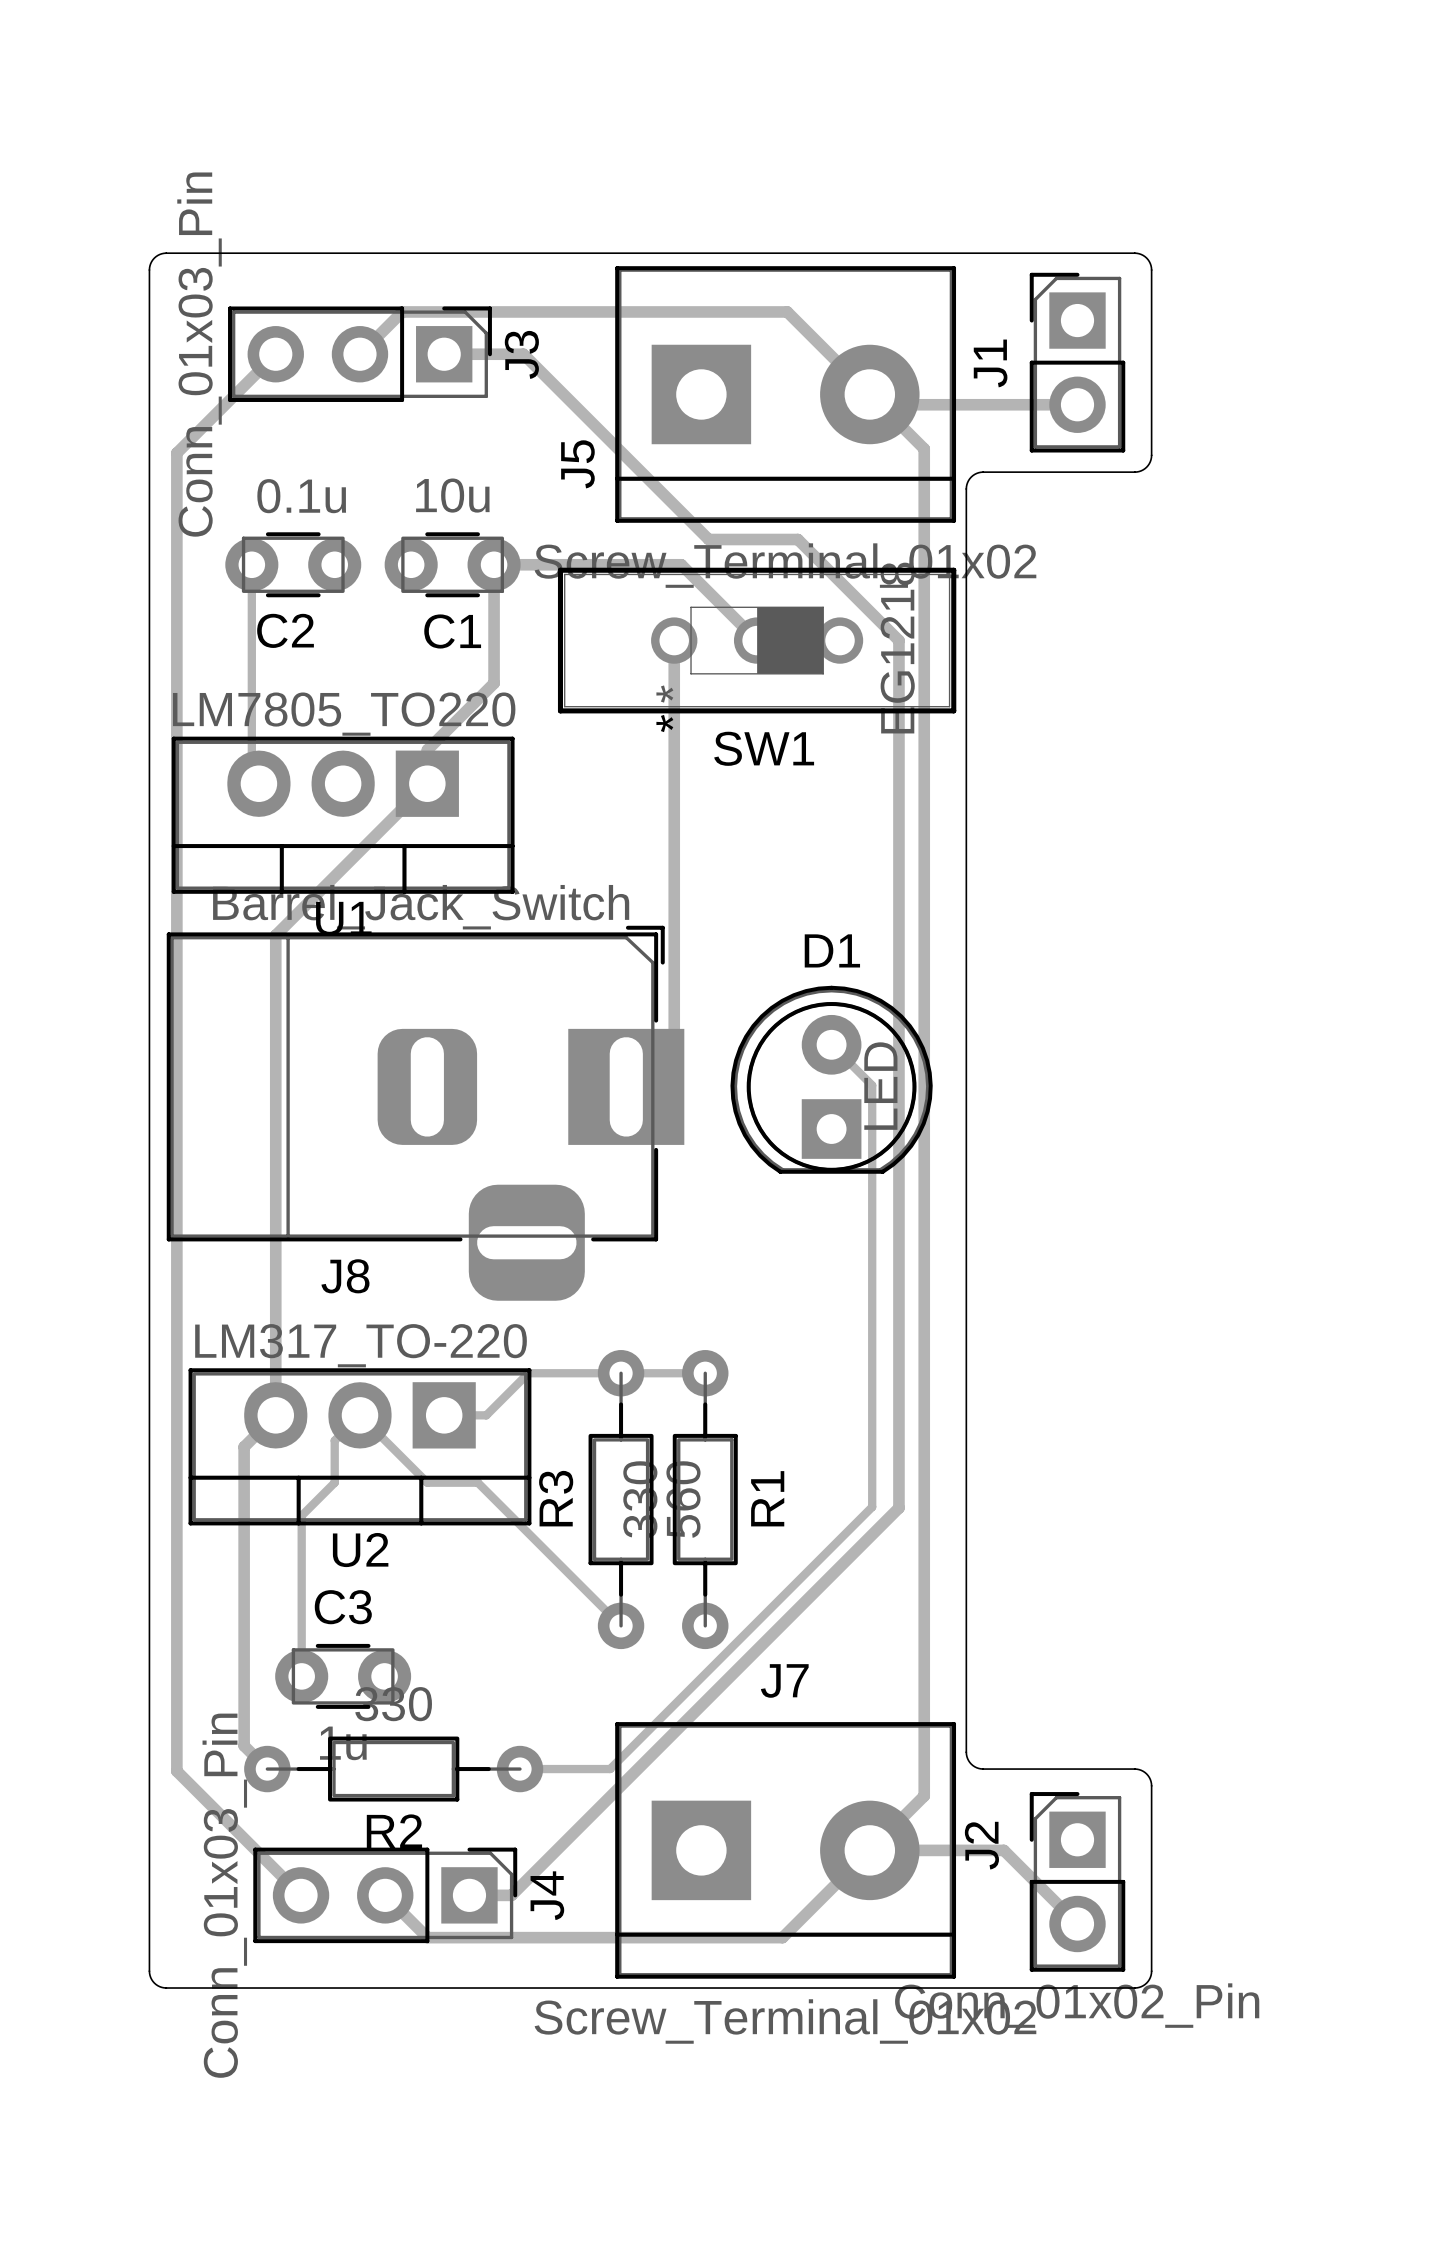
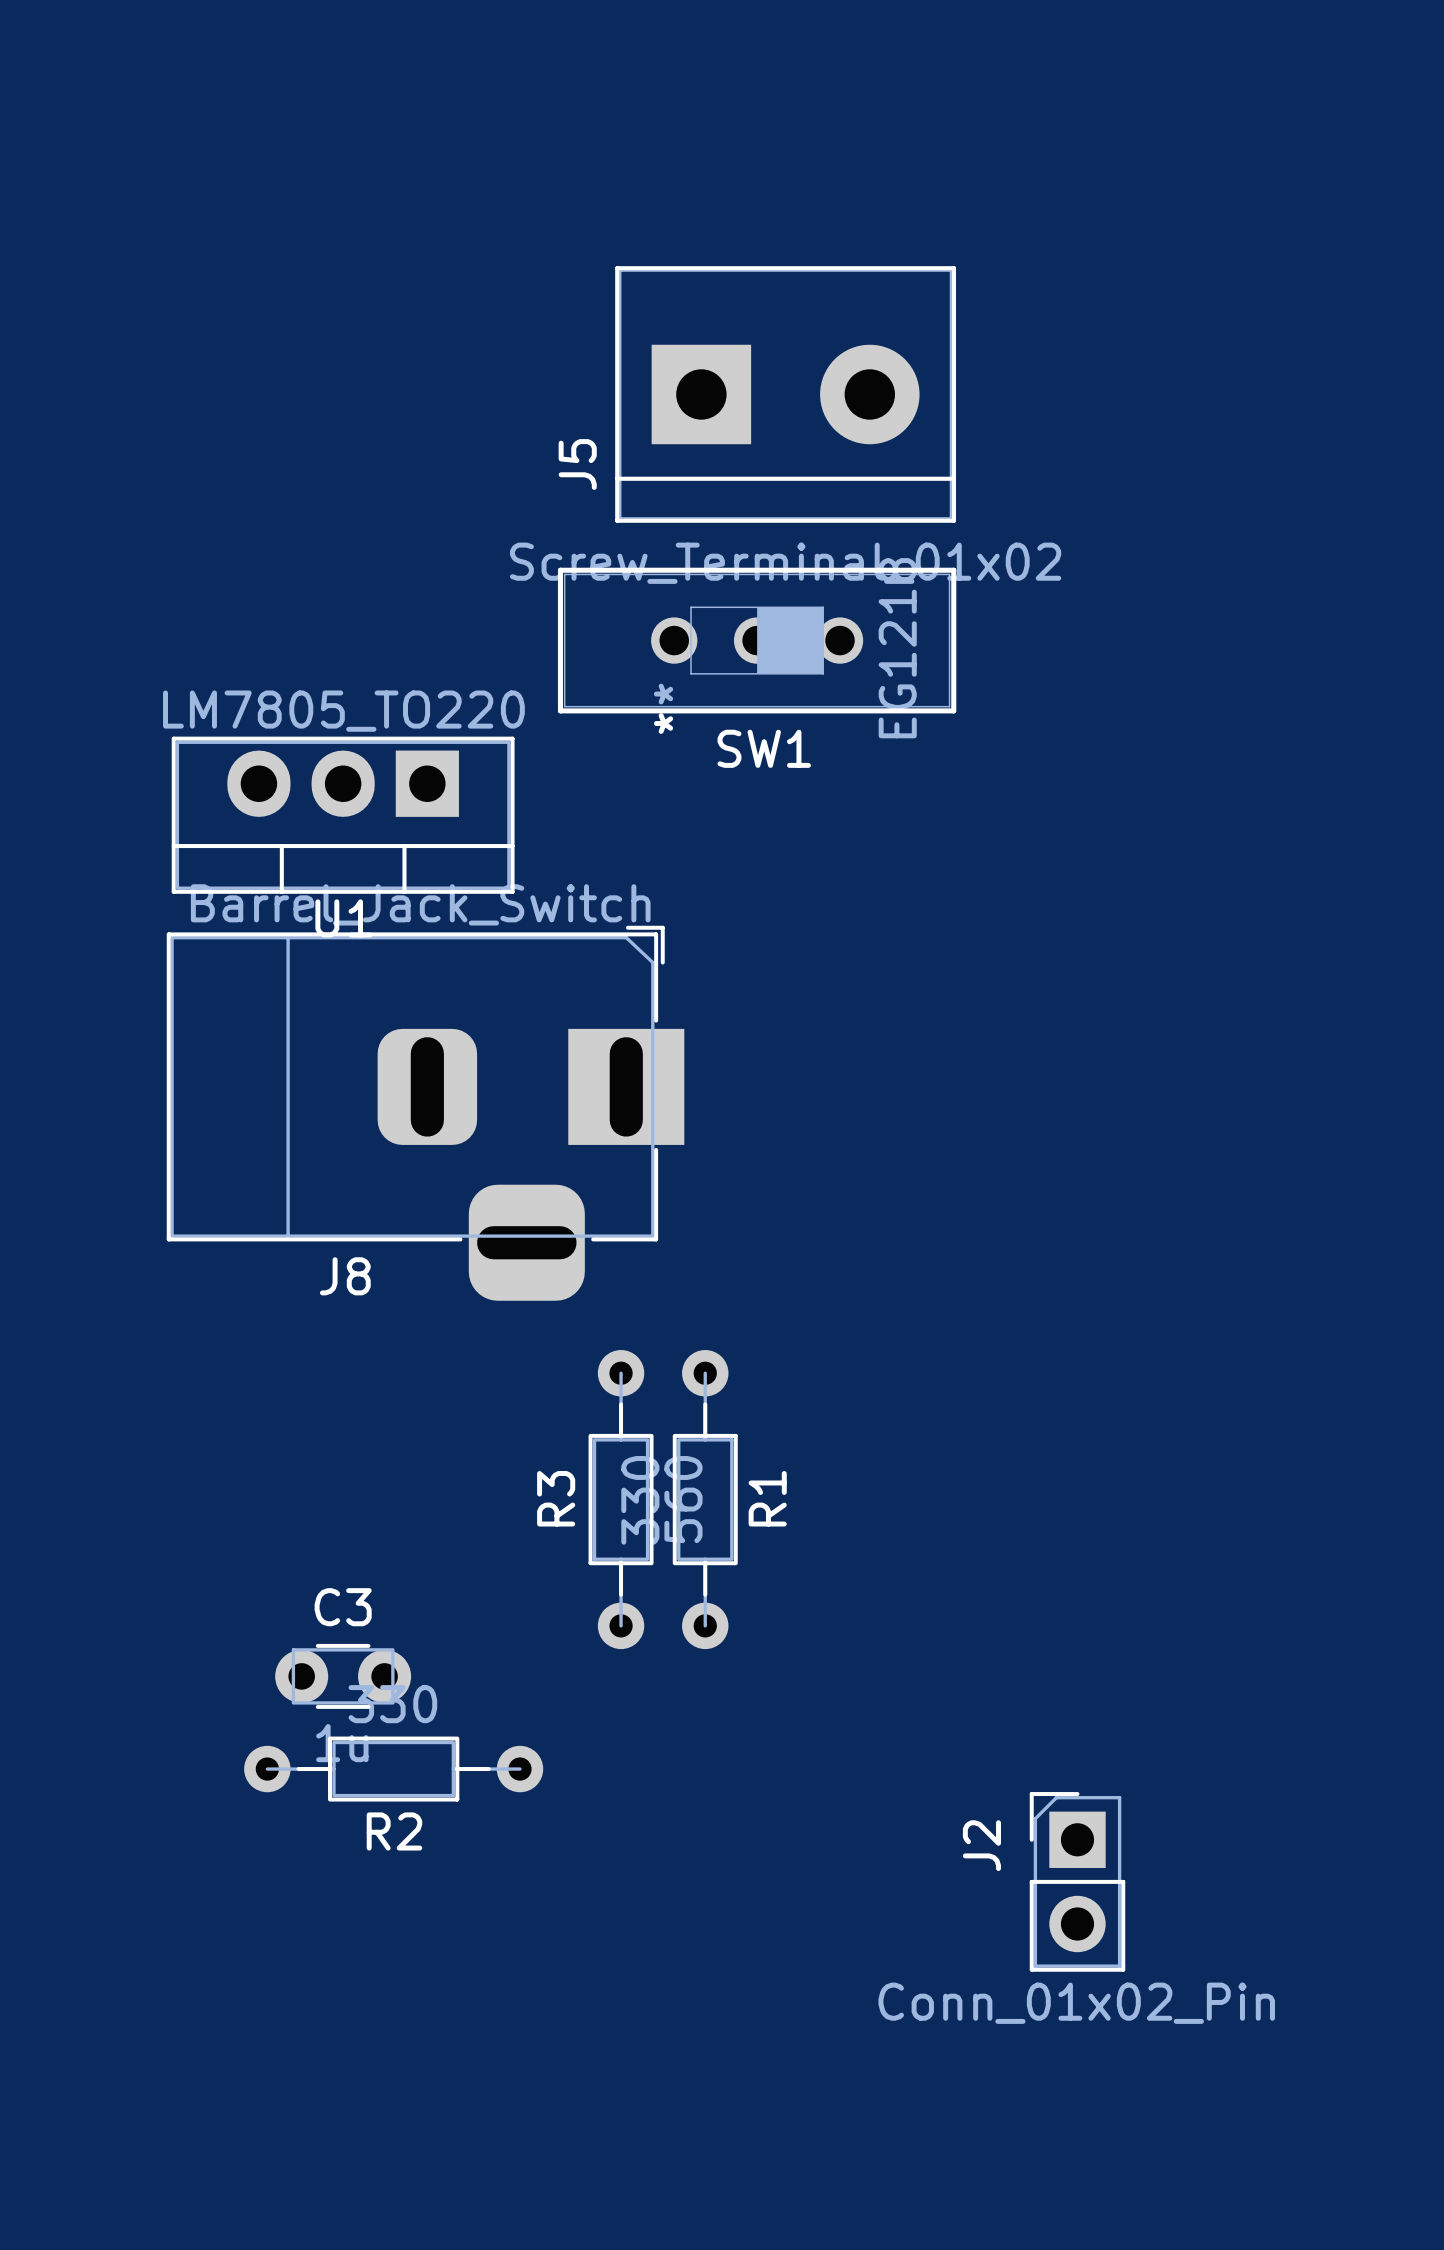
board edge: (166, 253) (1134, 253) (1143, 255) (1149, 261) (1151, 270) (1151, 455) (1148, 465) (1141, 470) (1134, 472) (980, 472) (969, 478) (966, 488) (966, 1754) (971, 1764) (980, 1768) (1134, 1769) (1141, 1770) (1148, 1775) (1151, 1785) (1151, 1971) (1149, 1979) (1143, 1985) (1134, 1988) (166, 1988) (157, 1985) (151, 1979) (149, 1971) (149, 270) (154, 258) (166, 253) -> none
track: (275, 354) (176, 453) (176, 1771) (301, 1895) -> none
track: (359, 354) (402, 311) (787, 311) (924, 448) (924, 1795) (782, 1937) (427, 1937) (385, 1895) -> none
J3: Conn_01x03_Pin (359, 354) -> none
track: (444, 354) (523, 354) (708, 539) (797, 539) (898, 640) (898, 1507) (511, 1895) (469, 1895) -> none
J1: (1077, 362) -> none
track: (880, 404) (1077, 404) -> none
track: (251, 564) (251, 776) (258, 783) -> none
C2: 0.1u (293, 564) -> none
C1: 10u (452, 564) -> none
track: (674, 640) (674, 1038) (626, 1086) -> none
track: (748, 648) (757, 640) (681, 564) (494, 564) (494, 683) (427, 750) (427, 783) (275, 935) (275, 1415) (244, 1446) (244, 1745) (267, 1769) -> none
track: (831, 1044) (872, 1085) (872, 1507) (610, 1769) (519, 1769) -> none
D1: LED (831, 1079) -> none
track: (705, 1373) (528, 1373) (486, 1415) (444, 1415) -> none
U2: LM317_TO-220 (359, 1446) -> none
track: (621, 1625) (477, 1482) (427, 1482) (359, 1415) (334, 1440) (334, 1482) (301, 1515) (301, 1676) -> none
J7: Screw_Terminal_01x02 (785, 1850) -> none
track: (869, 1850) (1003, 1850) (1077, 1924) -> none
J4: Conn_01x03_Pin (385, 1895) -> none

